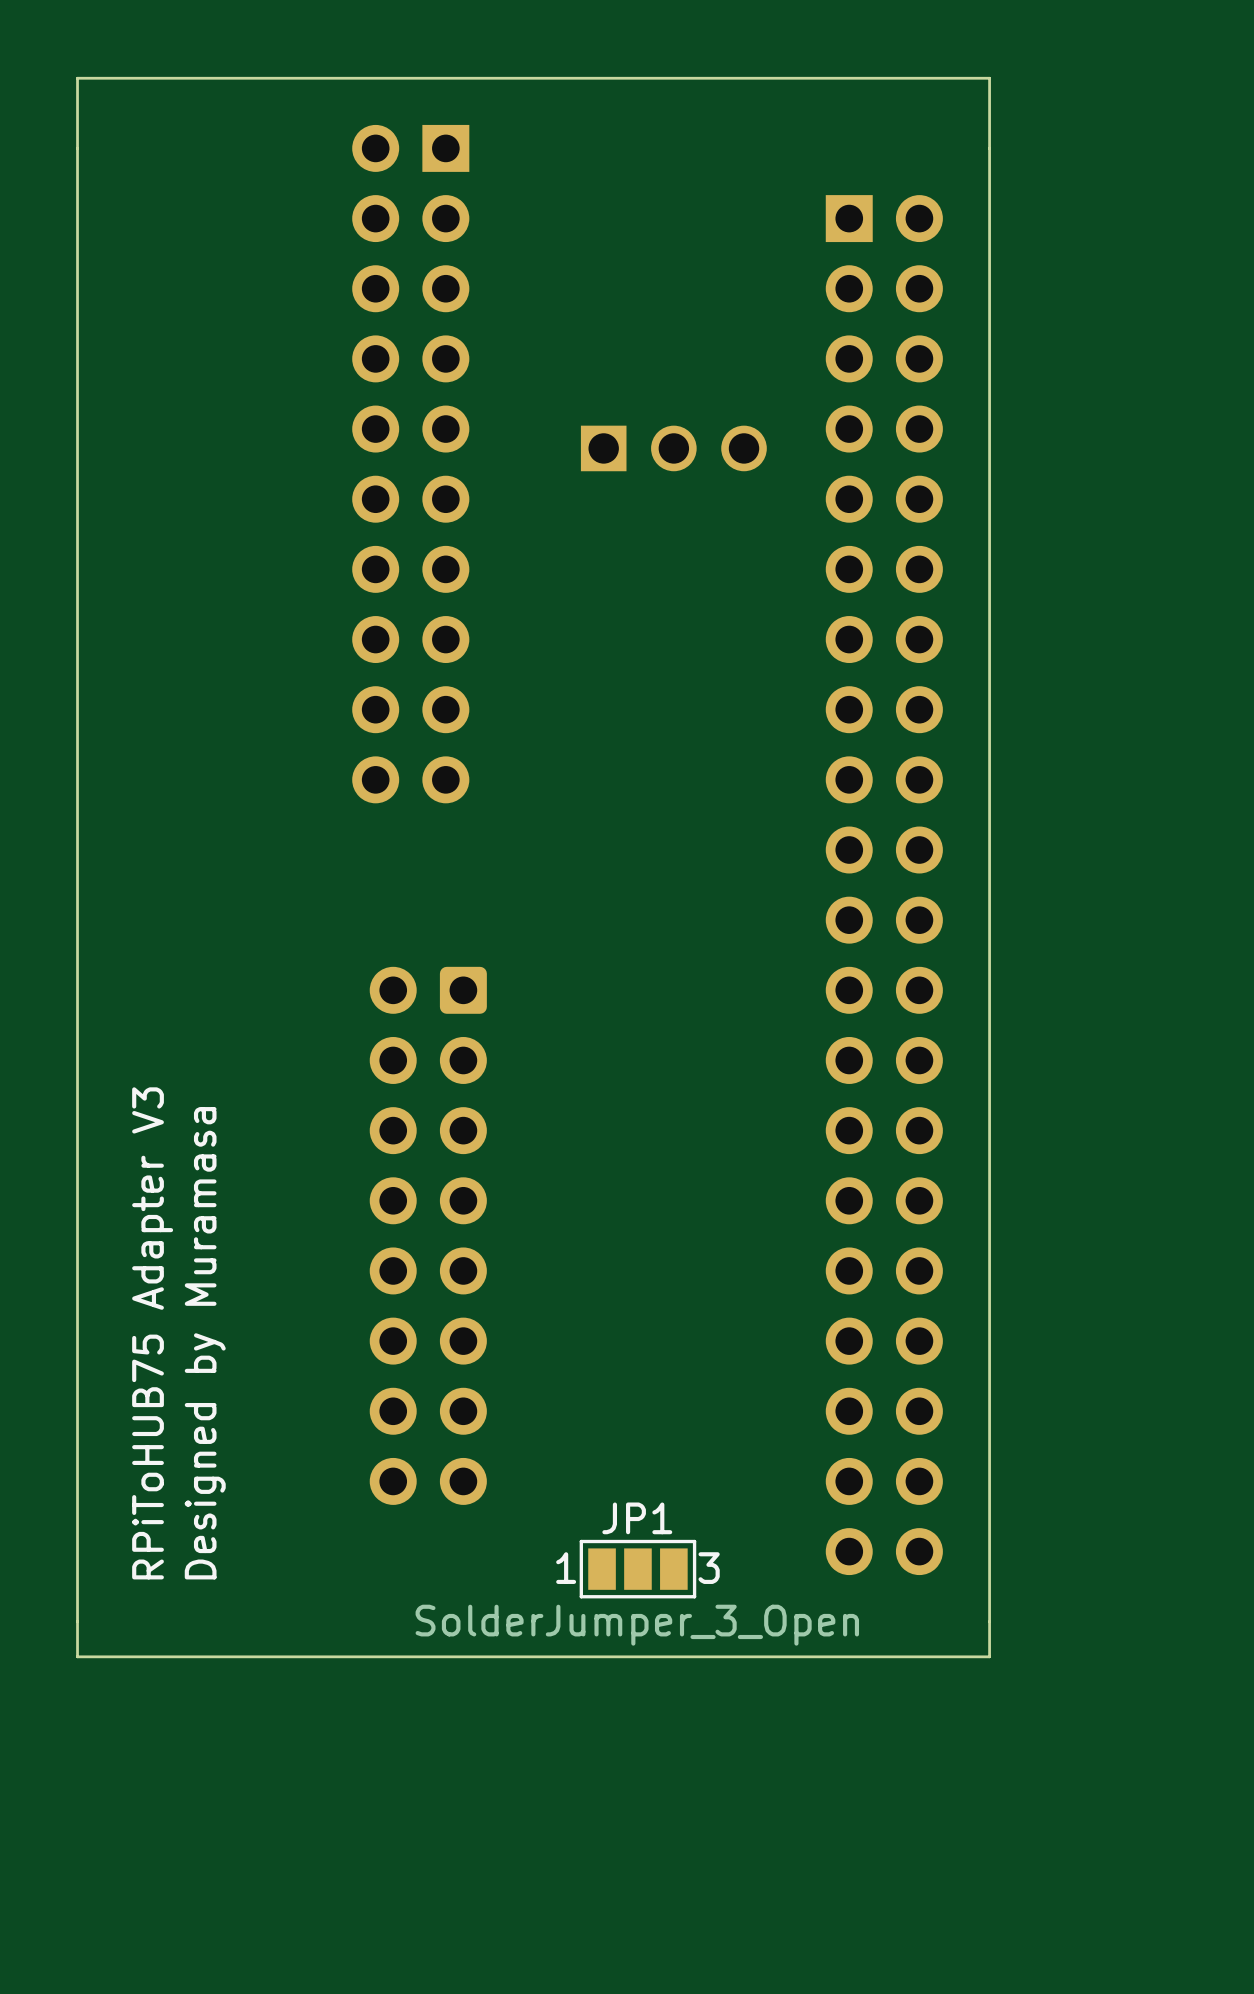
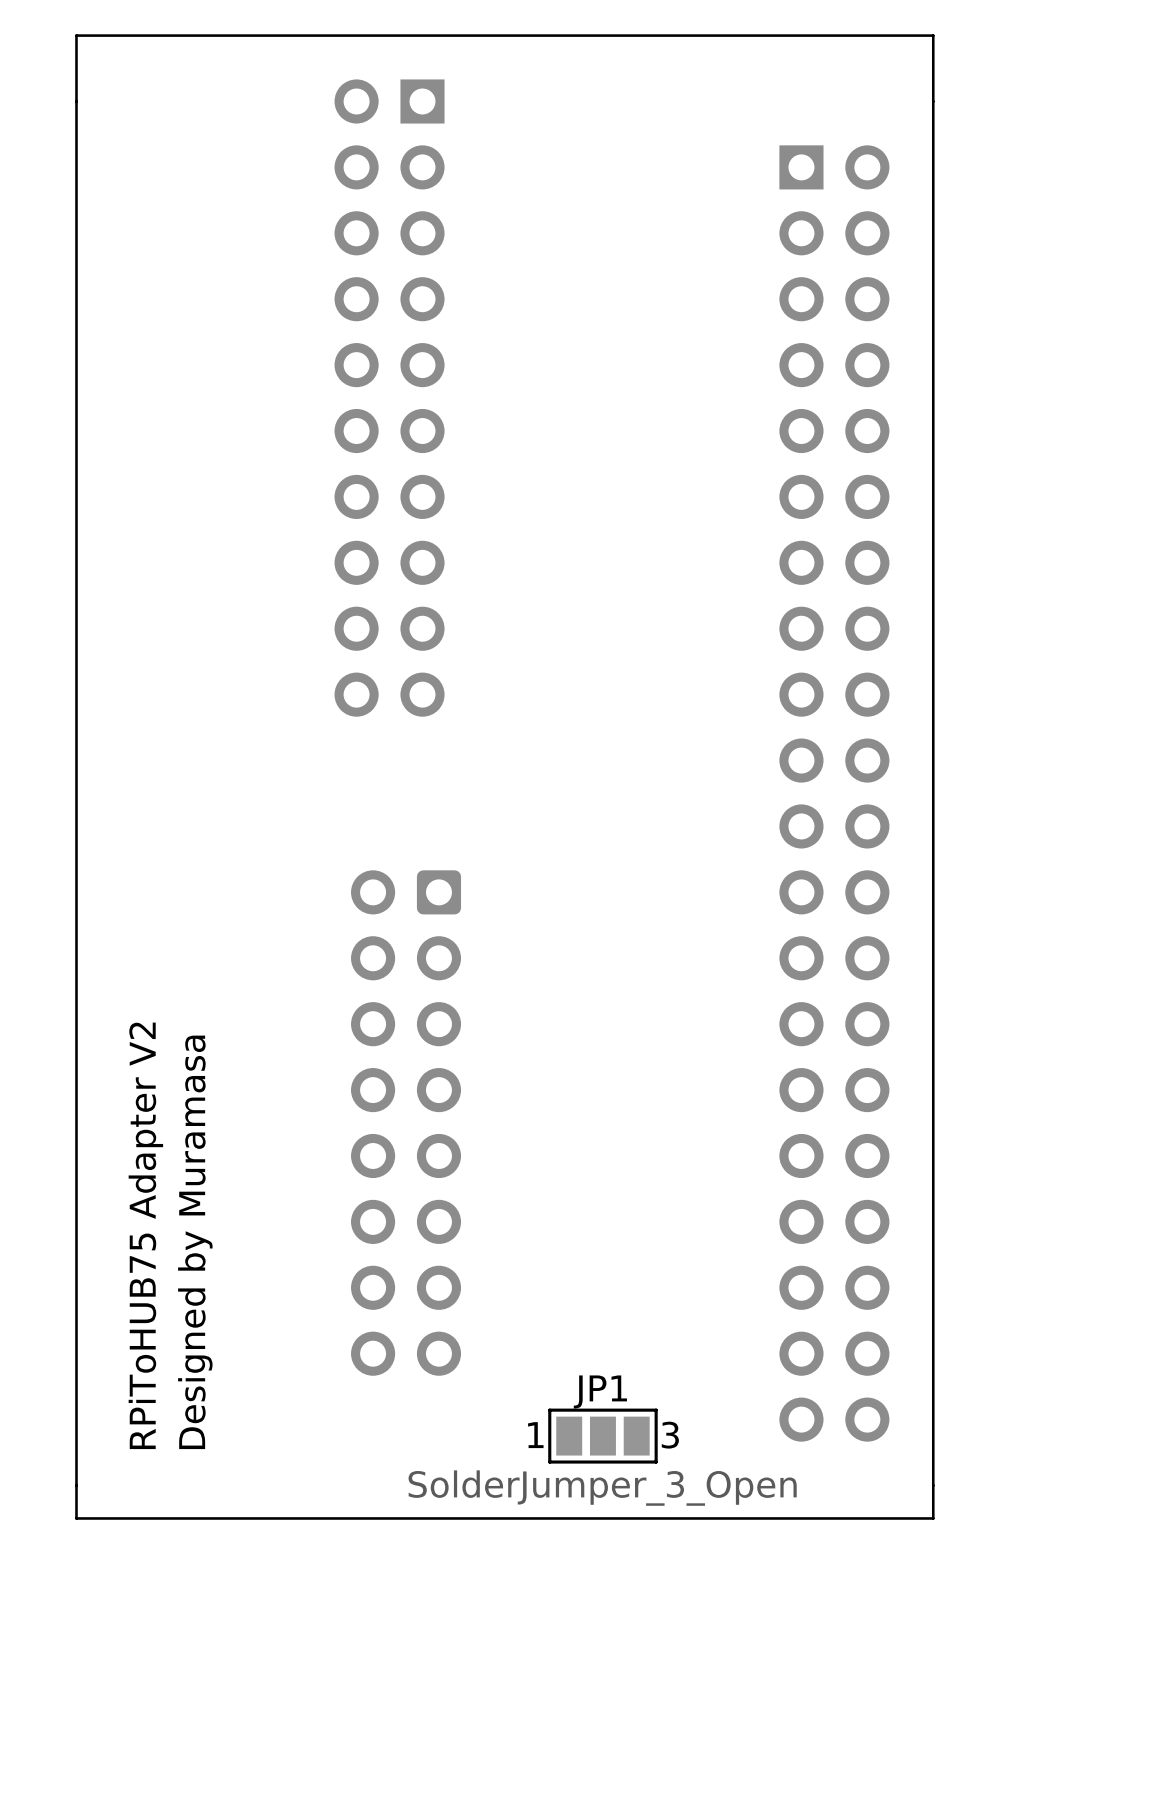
part: (673, 448) -> none
text: RPiToHUB75 Adapter V3 (152, 1333) -> RPiToHUB75 Adapter V2 (145, 1235)

